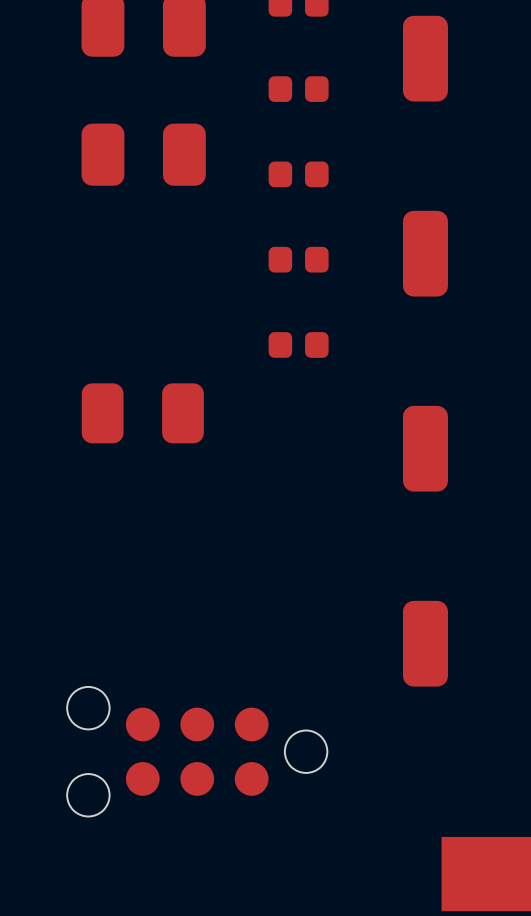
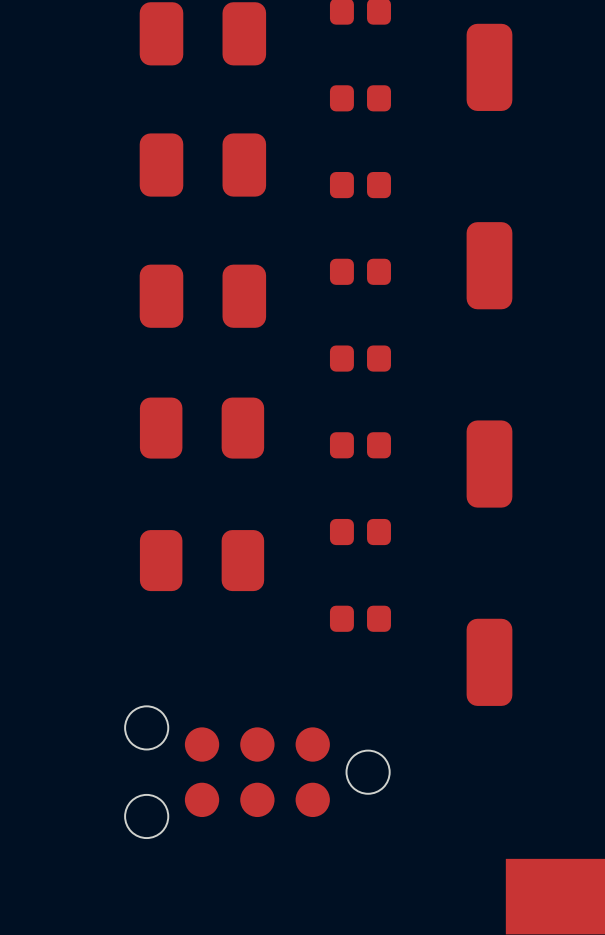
part: none -> (202, 296)
part: none -> (360, 445)
part: none -> (360, 532)
part: none -> (202, 560)
part: none -> (360, 618)

